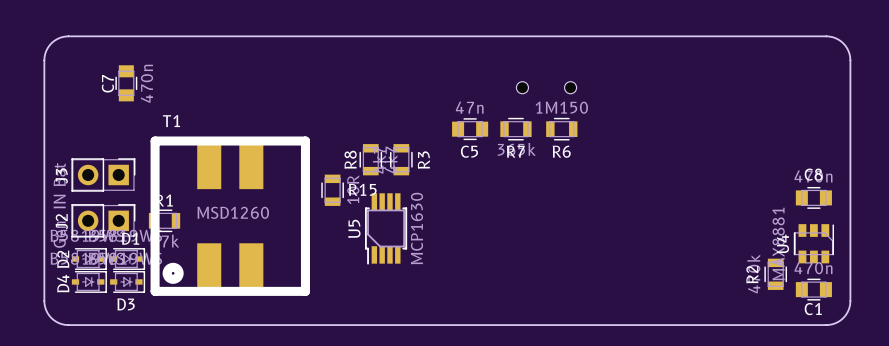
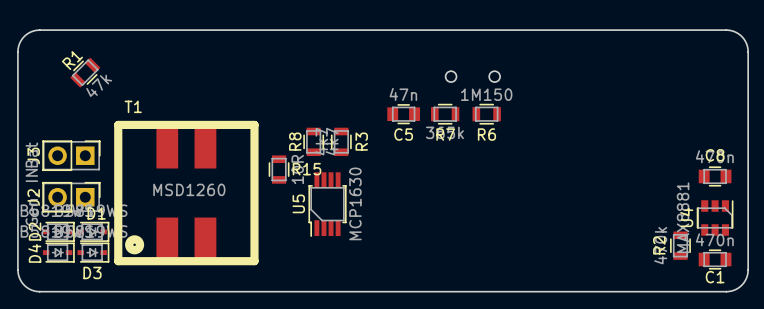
C7: 470n (126, 83) -> none
R1 rotation: 0° (164, 220) -> 45° counterclockwise (85, 72)
R1 position: (164, 220) -> (85, 72)

